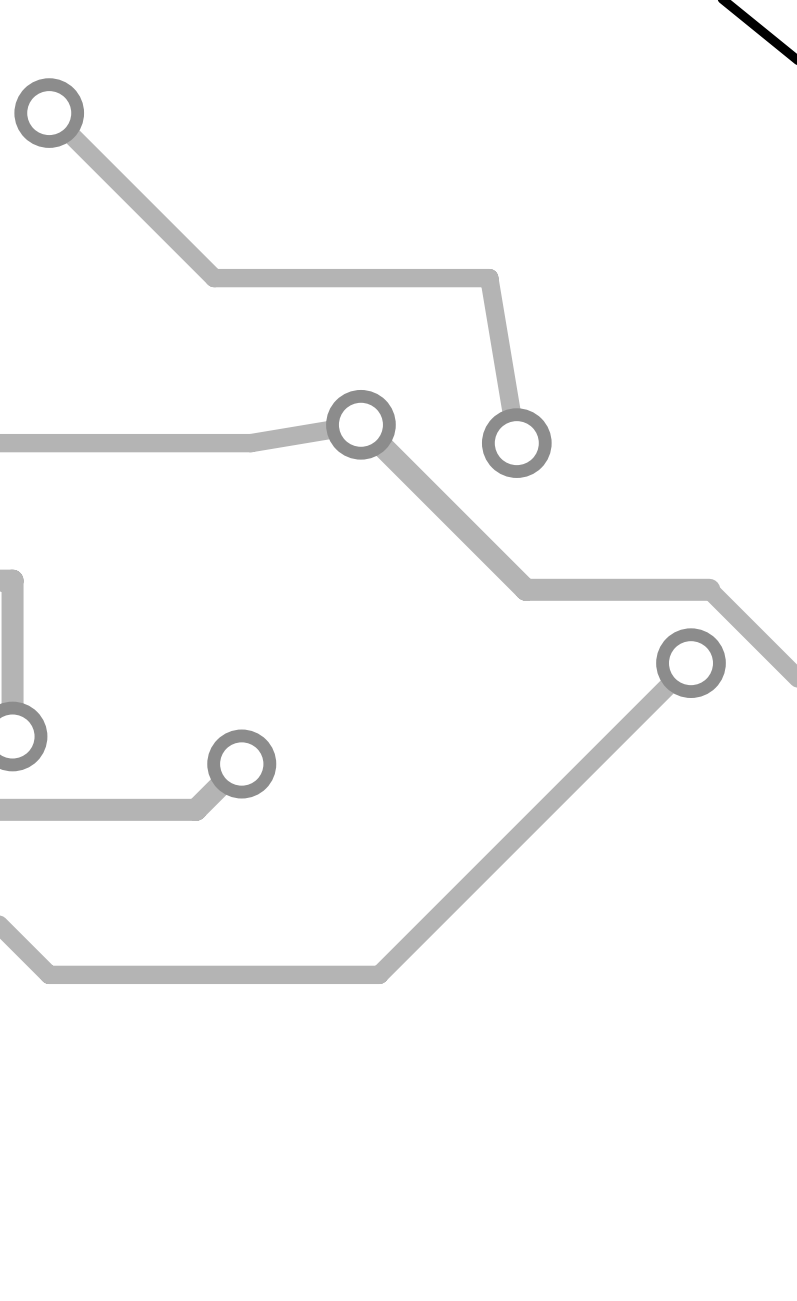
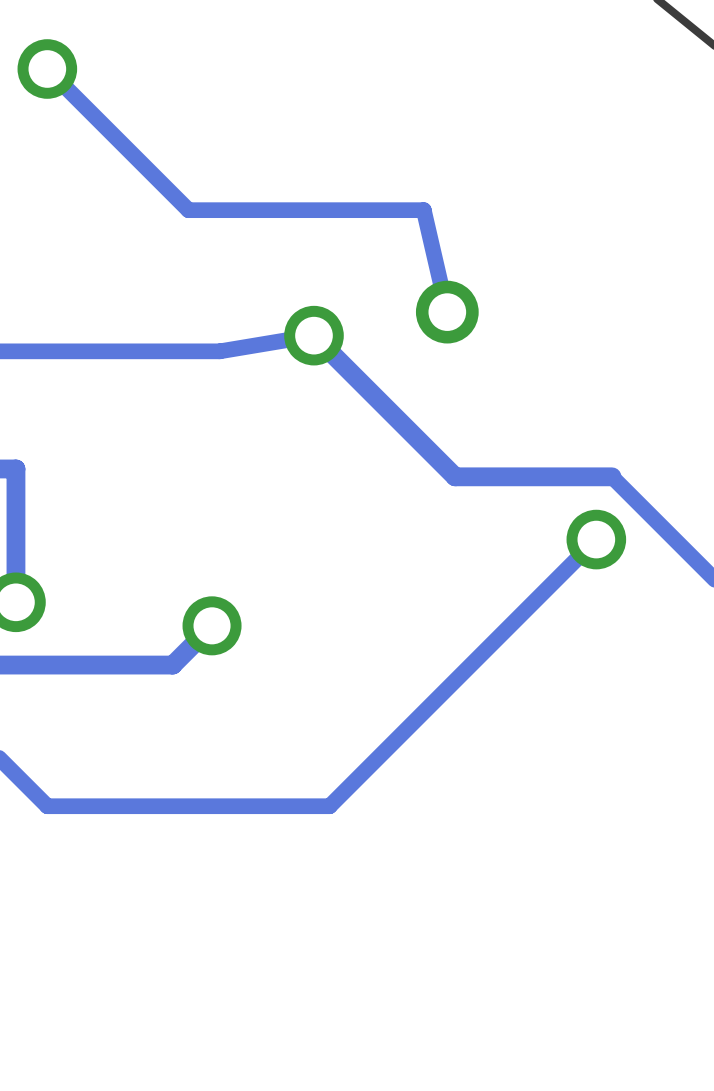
track: (489, 278) (516, 443) -> (423, 210) (447, 312)
via position: (516, 443) -> (447, 312)

